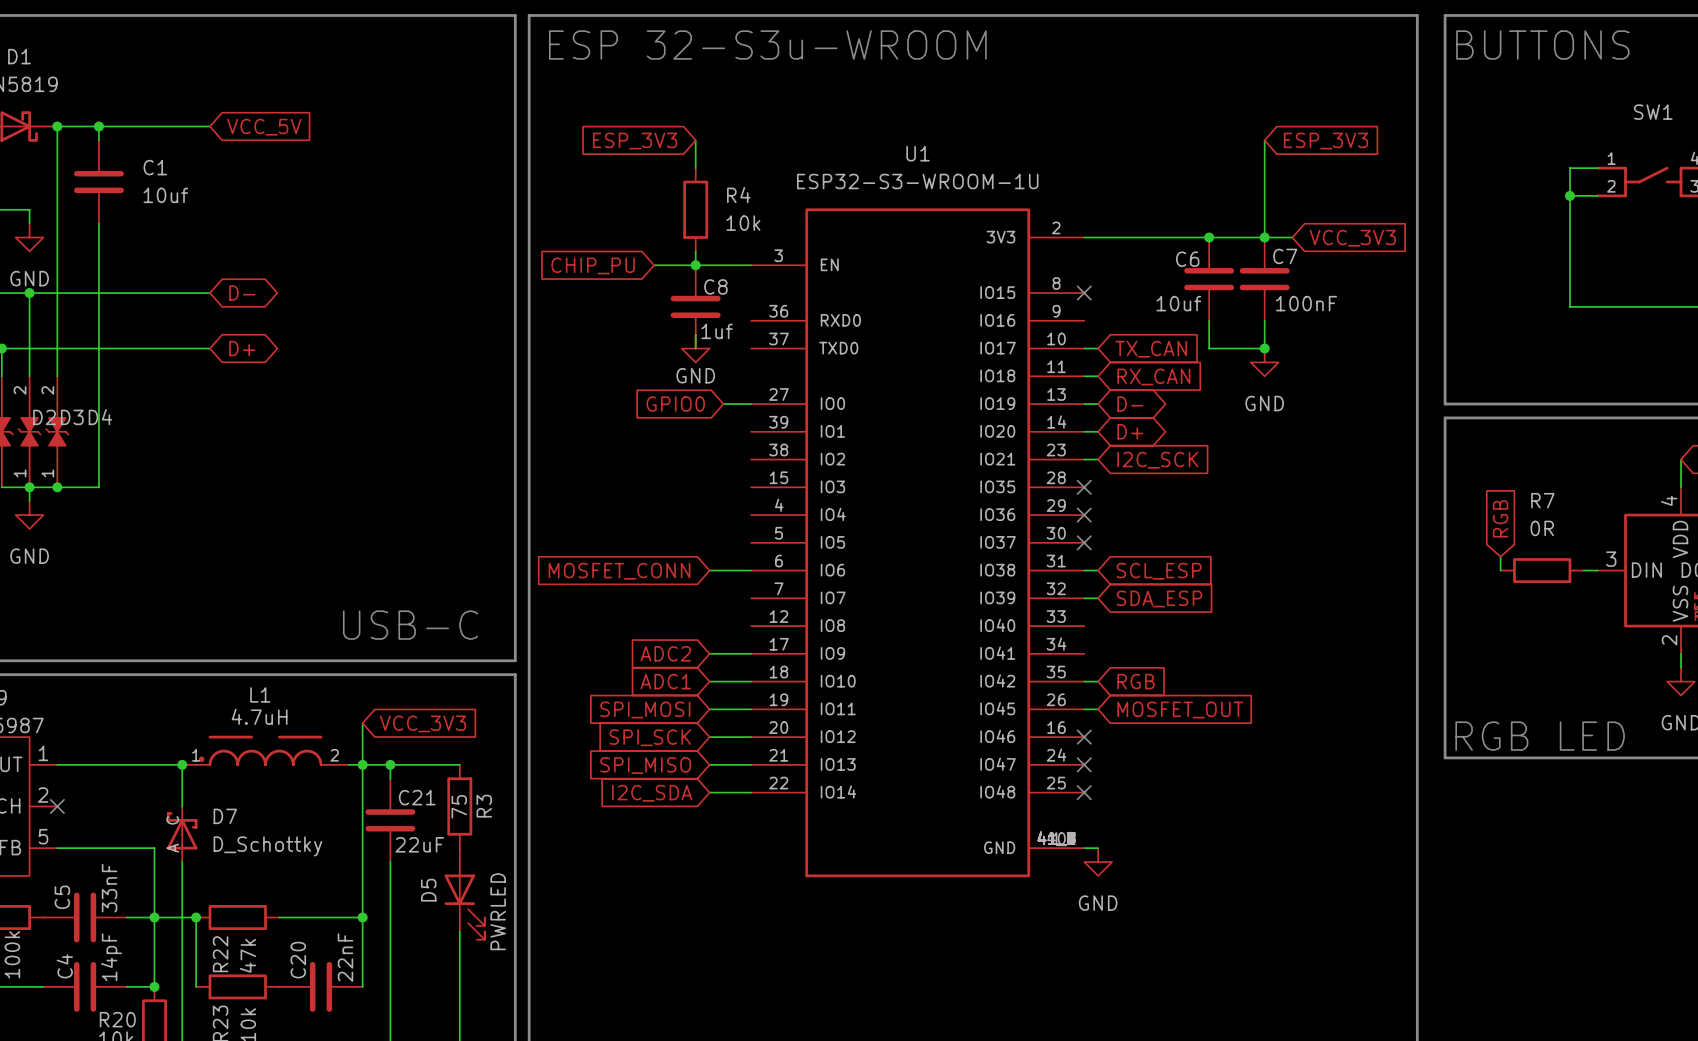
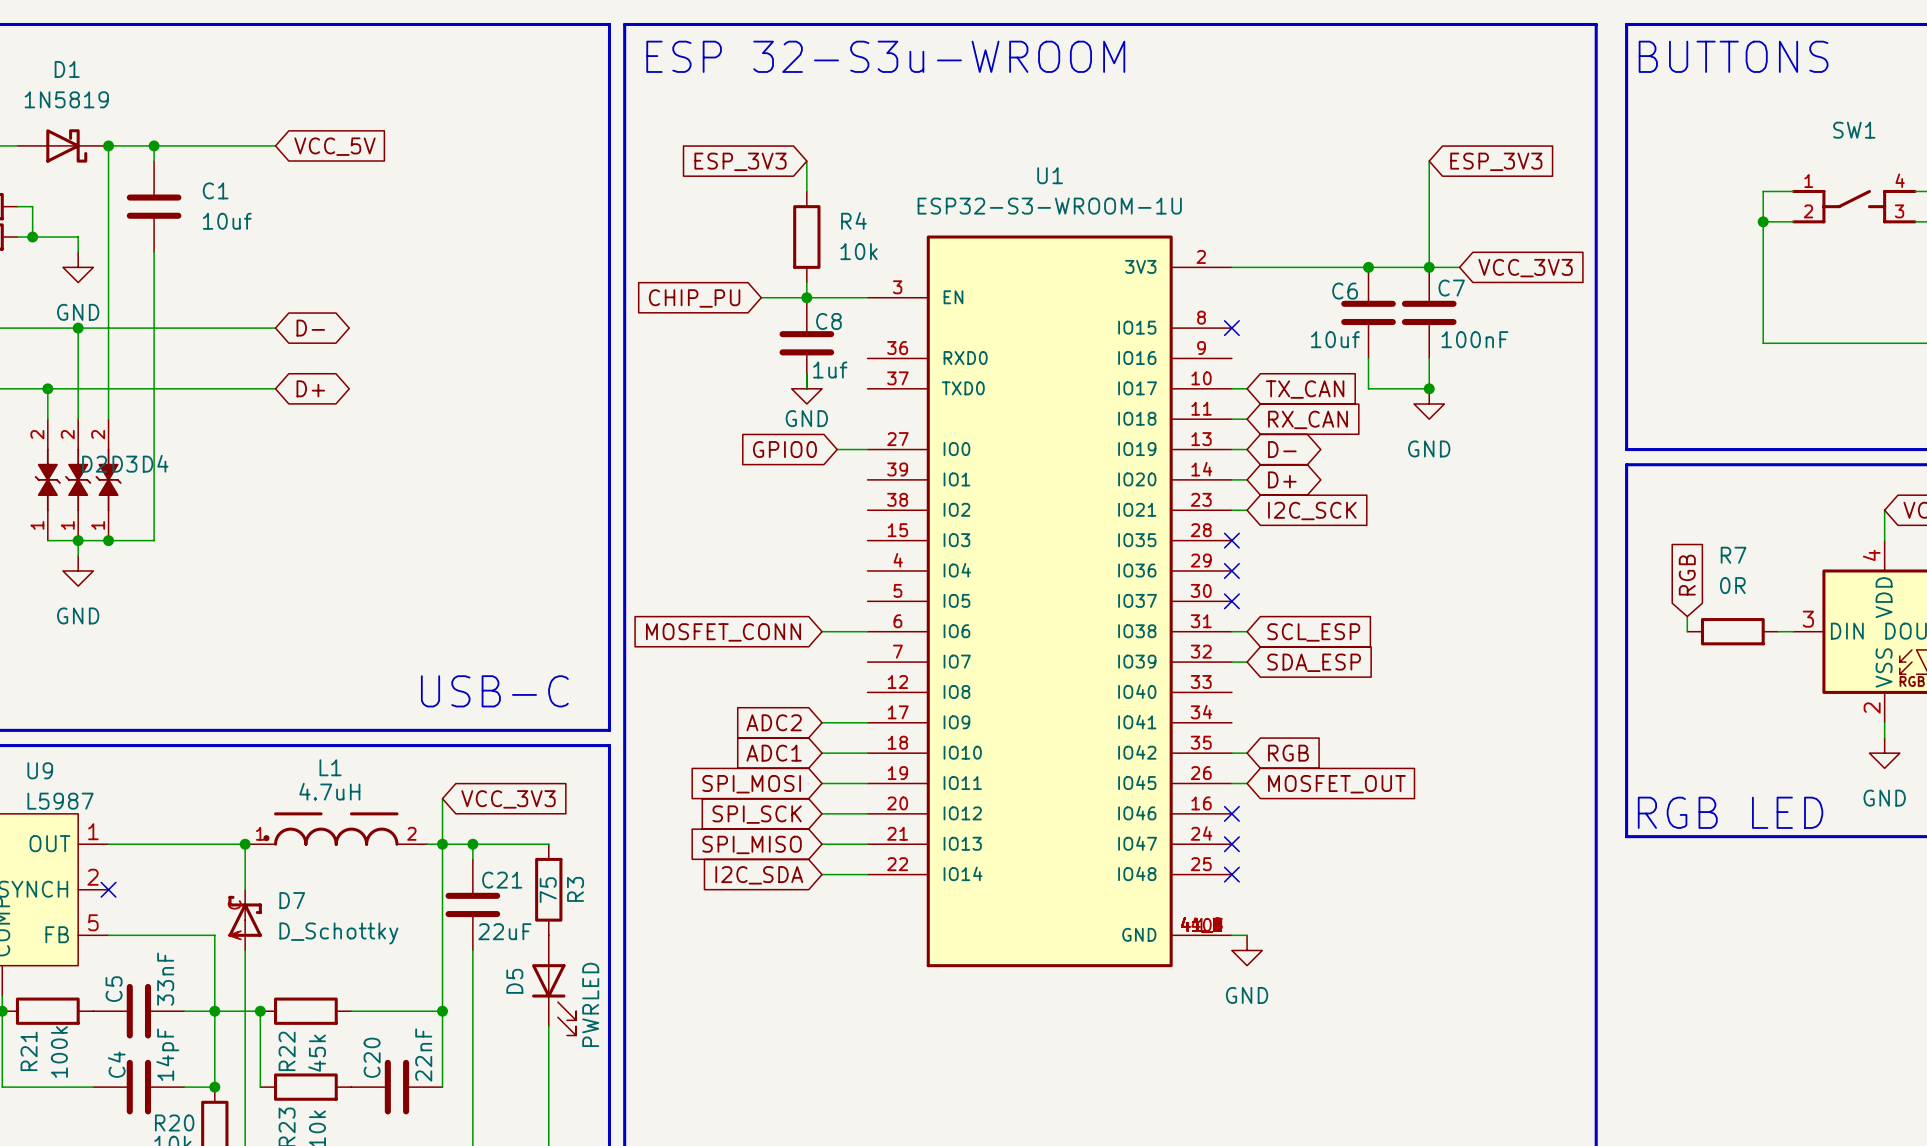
R22 value: 47k (248, 955) -> 45k (317, 1053)

